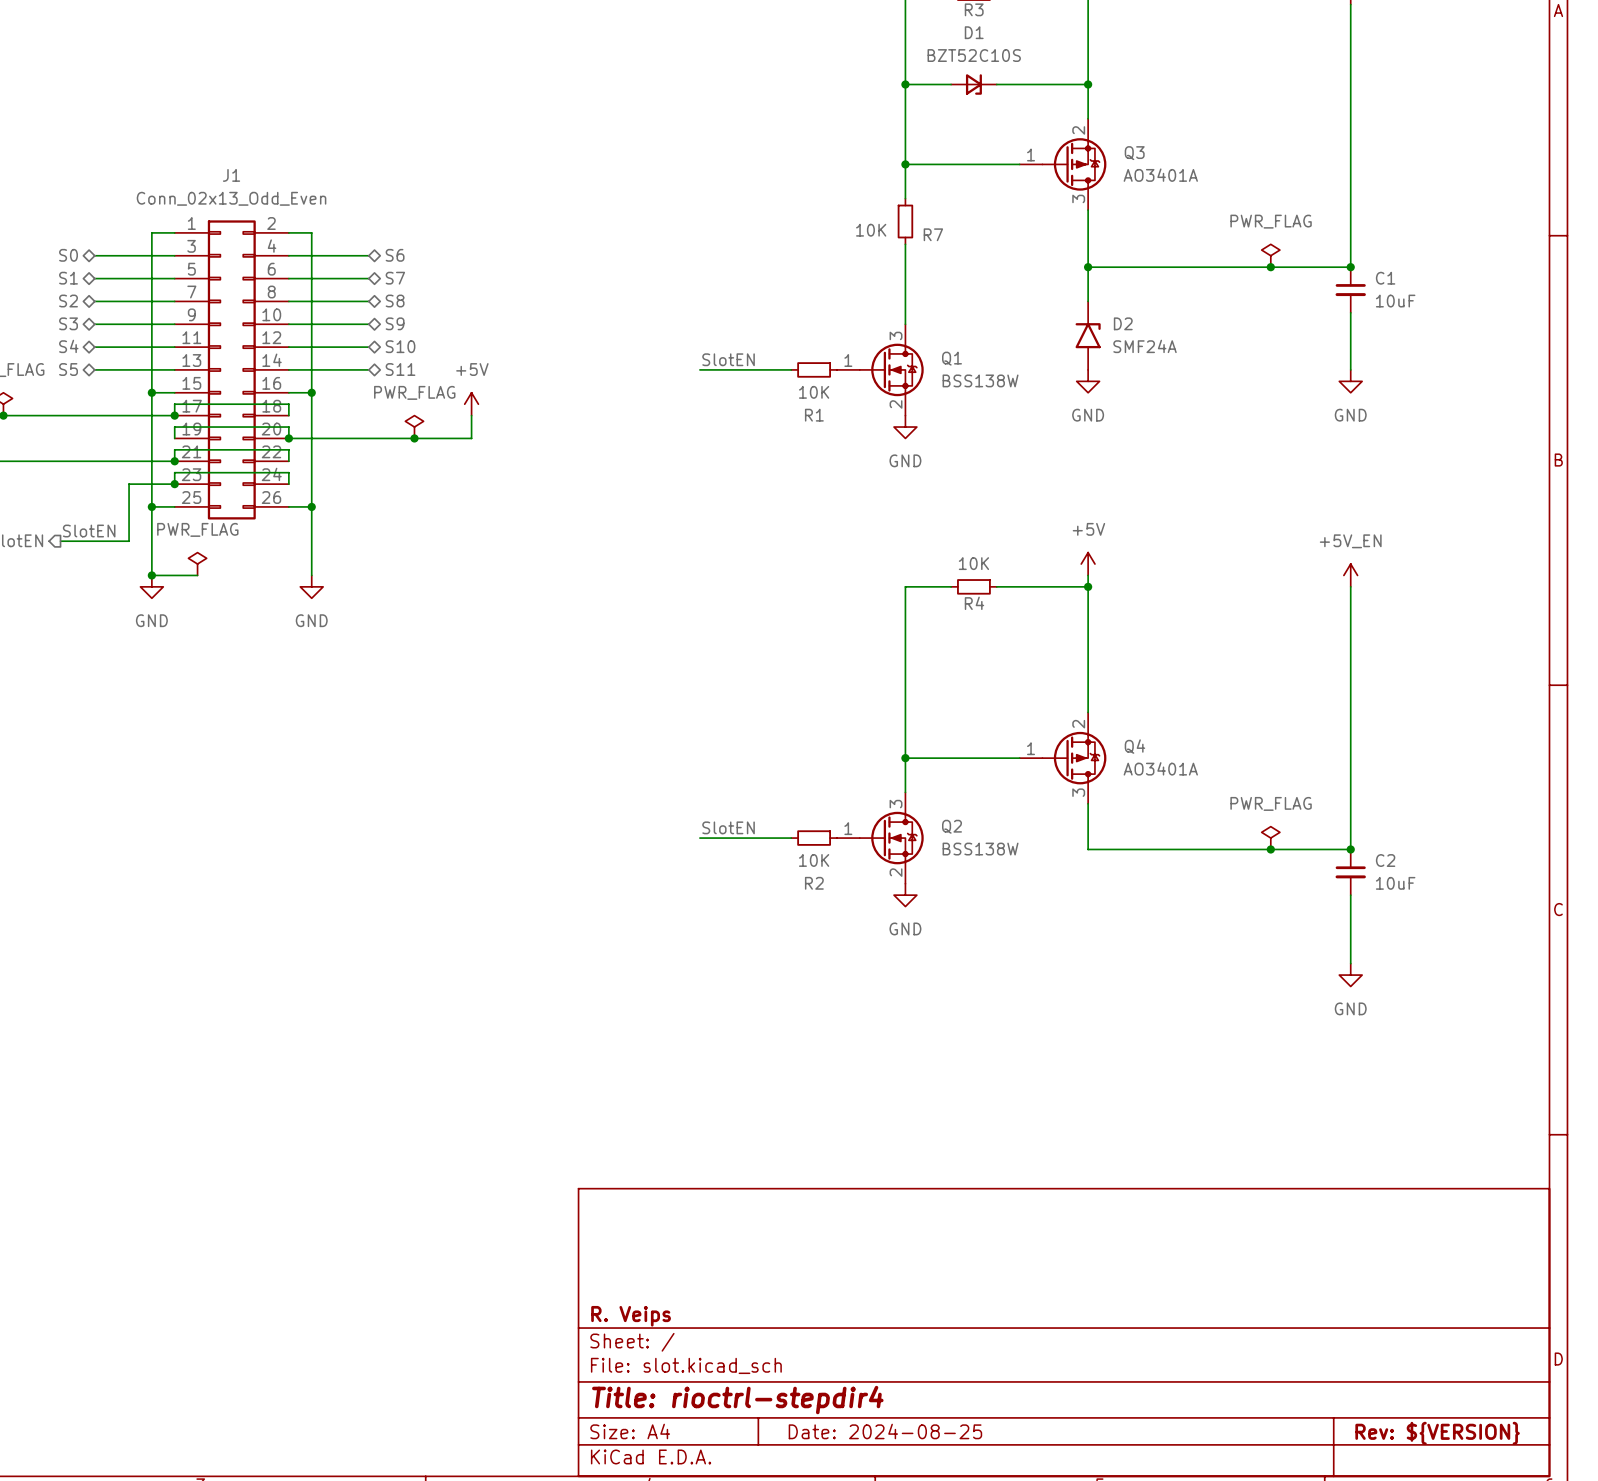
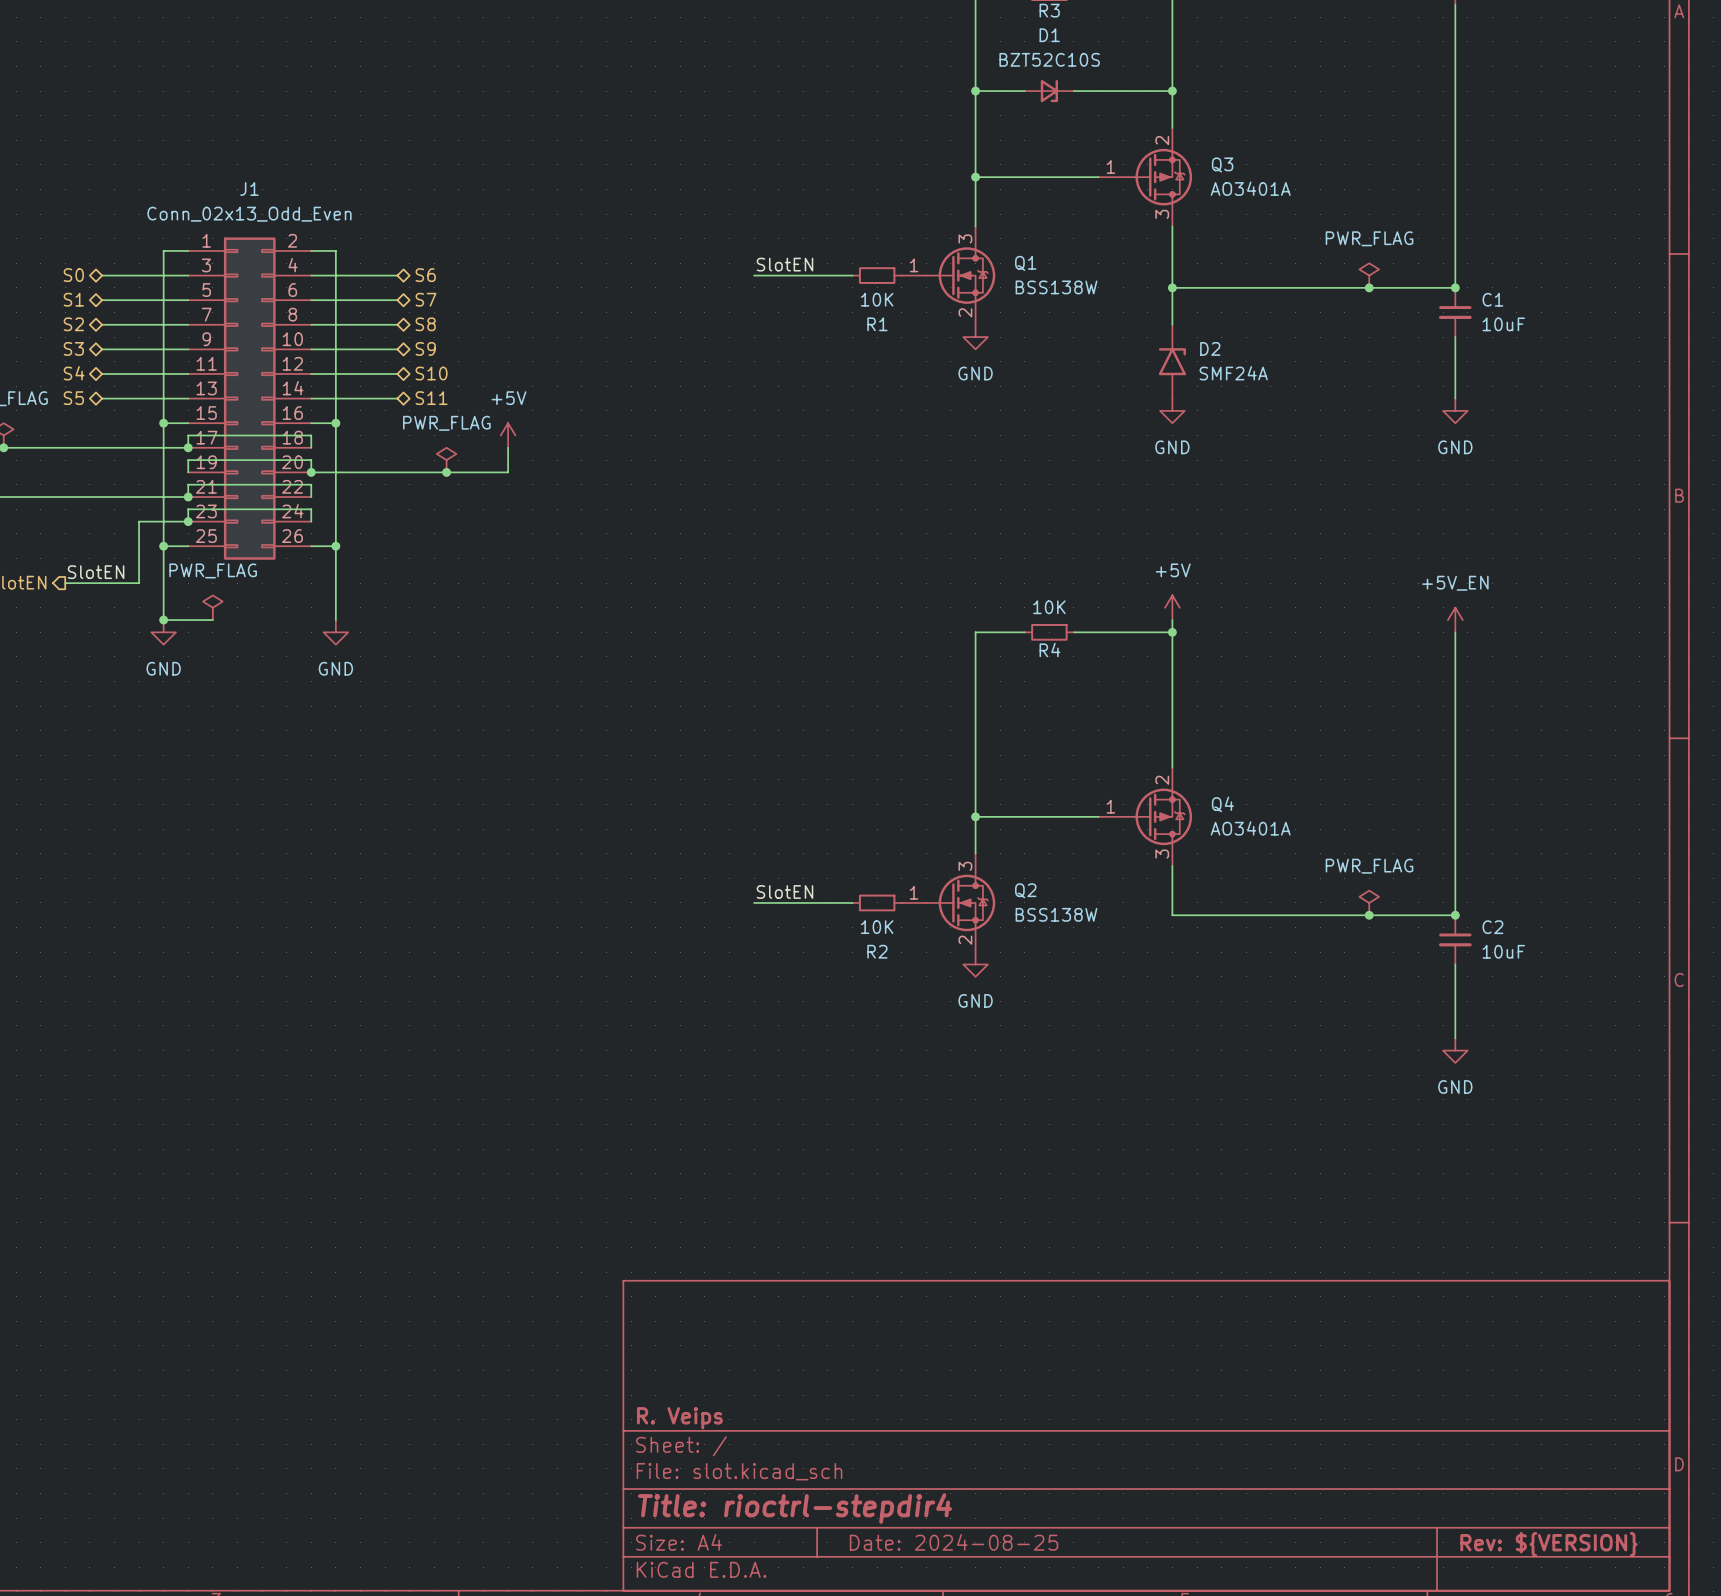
R7: 10K (905, 221) -> none
label position: SlotEN (728, 359) -> SlotEN (784, 264)
wire: (699, 369) (791, 369) -> (754, 275) (852, 275)
R1 position: (814, 369) -> (877, 275)
Q1 position: (880, 369) -> (948, 275)
power symbol position: GND (905, 427) -> GND (975, 337)

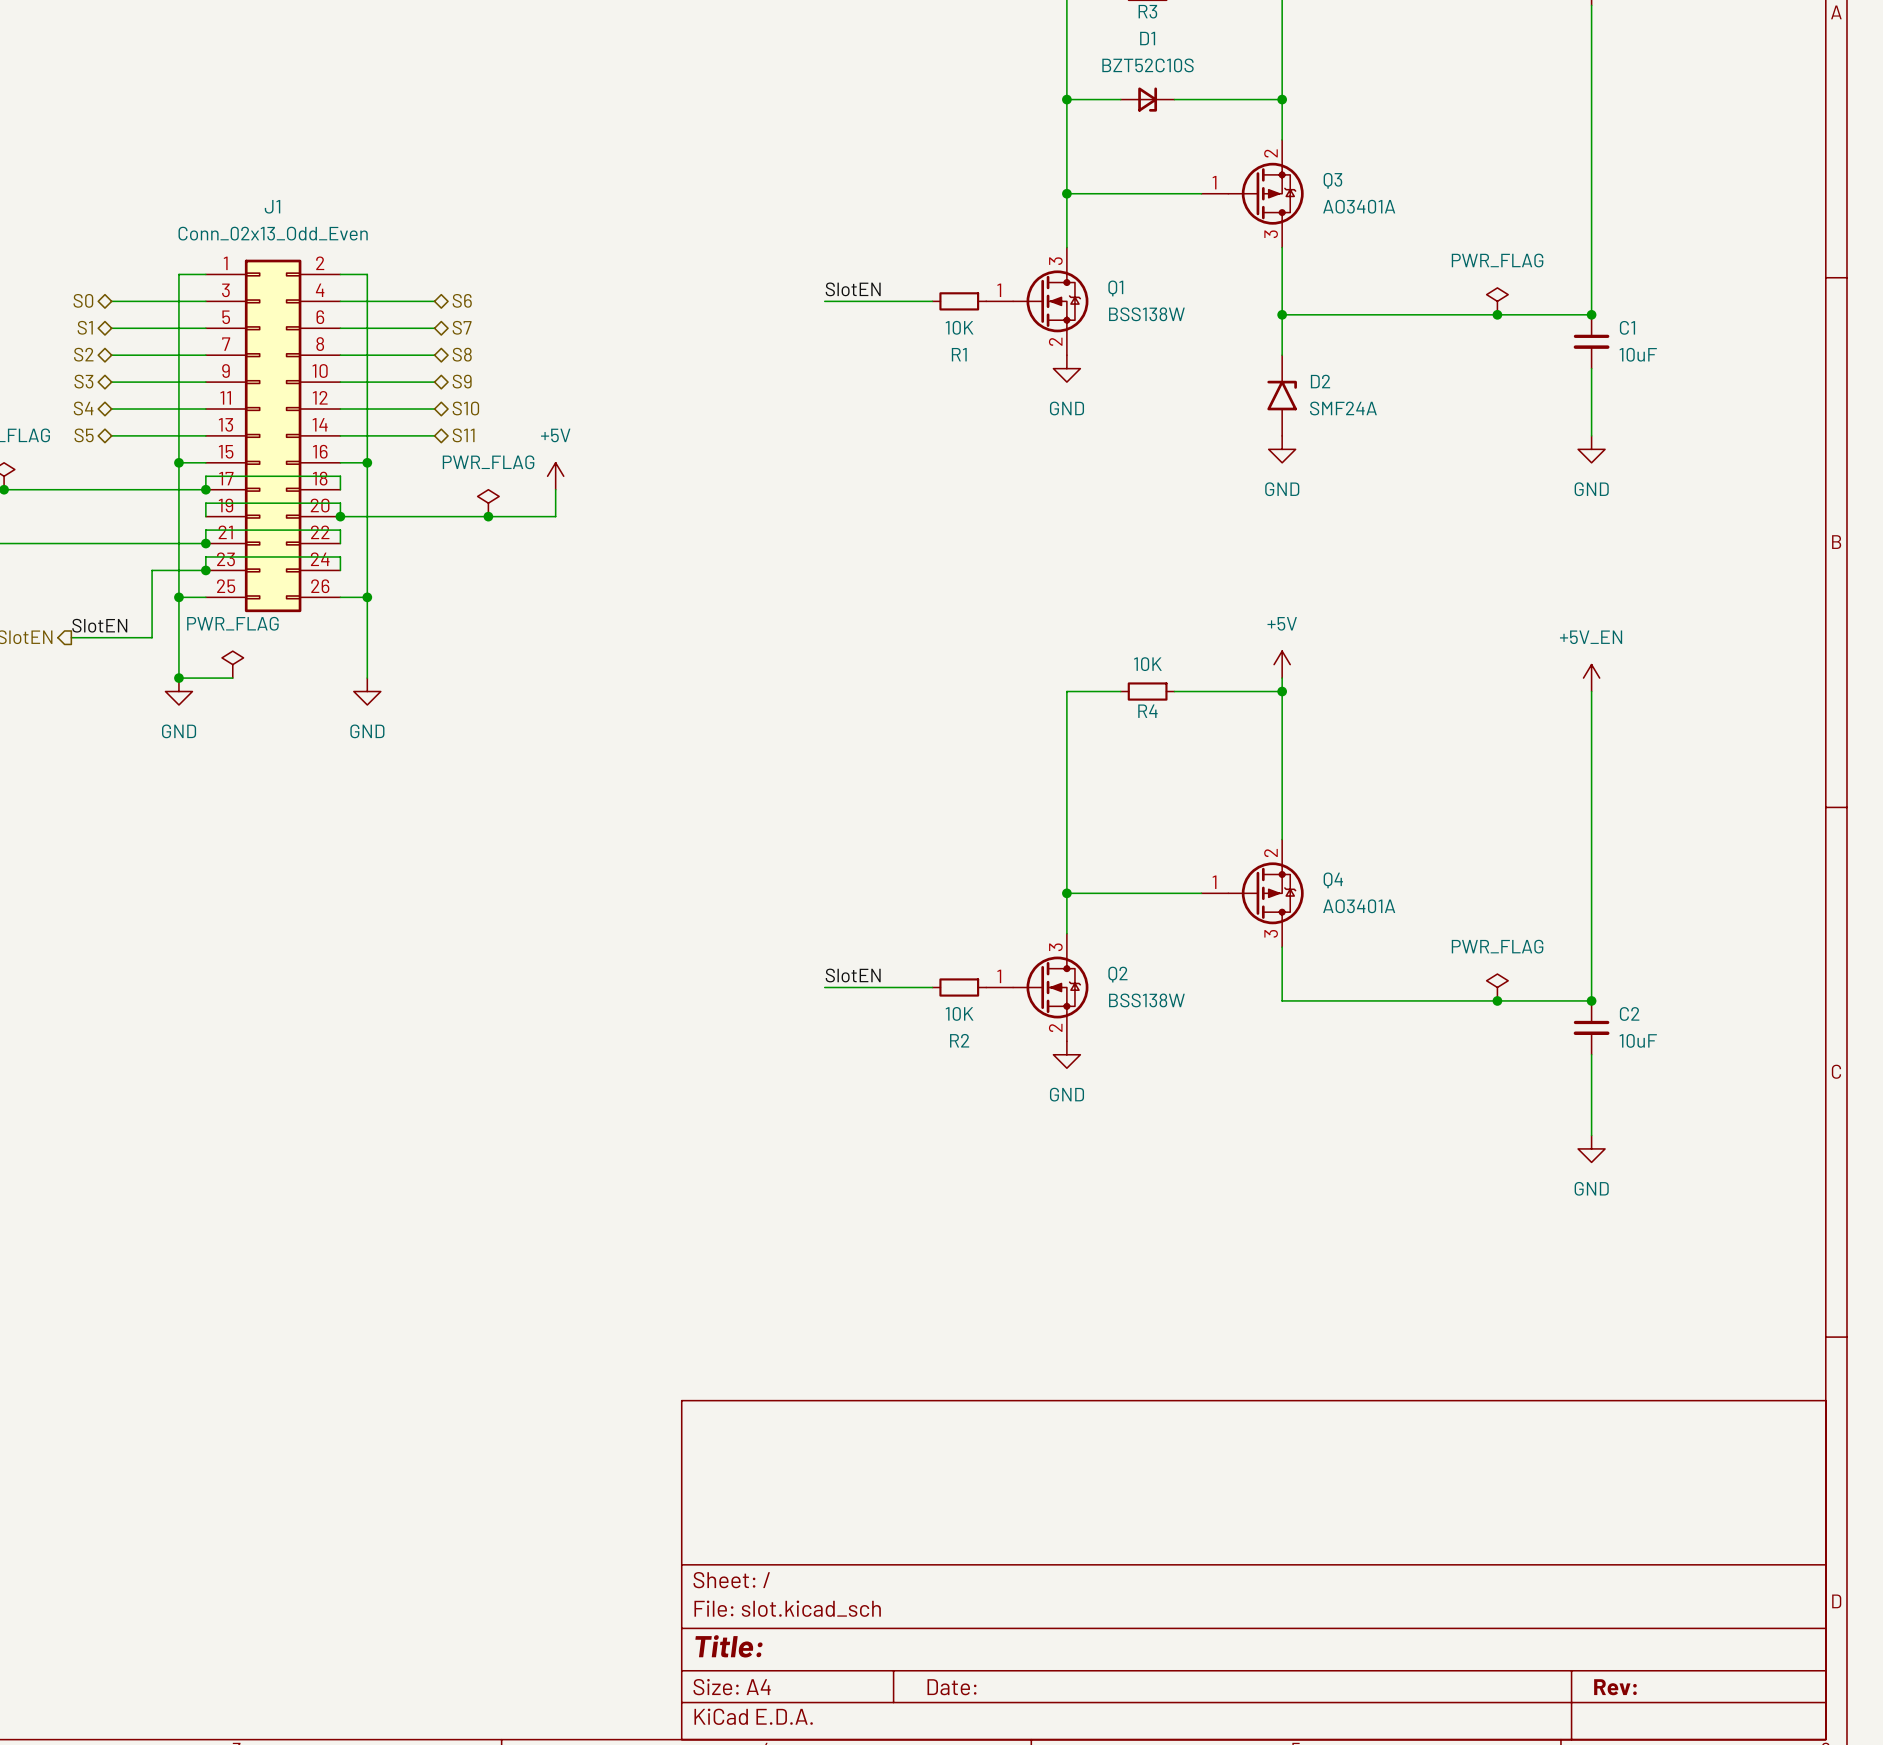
title block: R. Veips (679, 1418) -> none
title block: Title: rioctrl-stepdir4 (794, 1508) -> Title: (729, 1646)
title block: Date: 2024-08-25 (954, 1542) -> Date: (951, 1687)
title block: Rev: ${VERSION} (1548, 1544) -> Rev: (1615, 1687)

